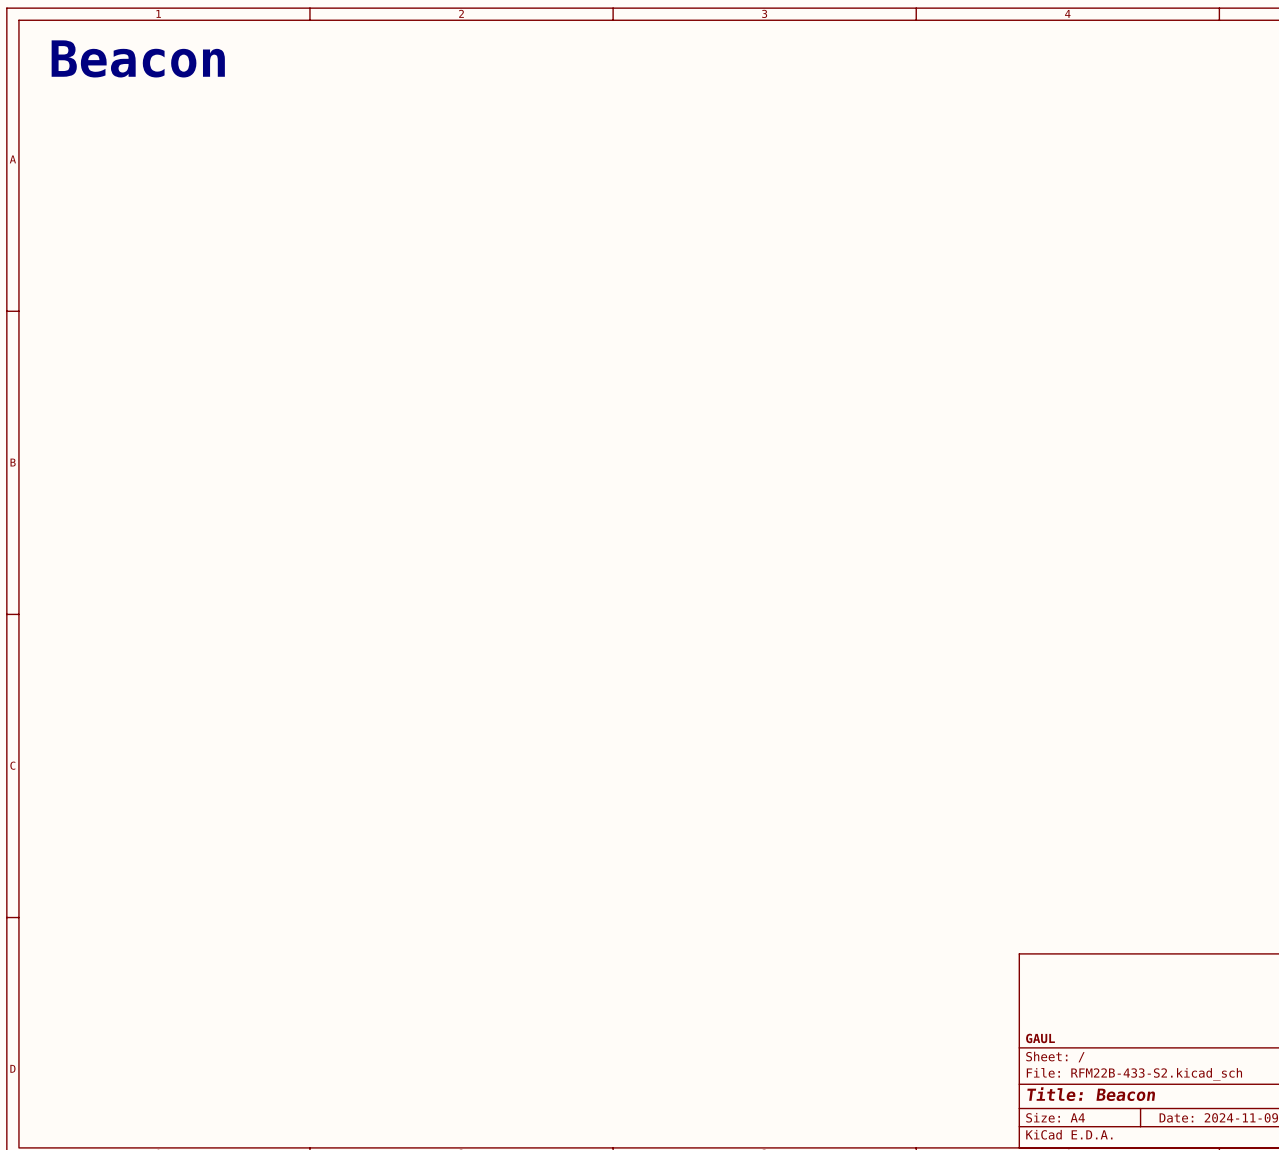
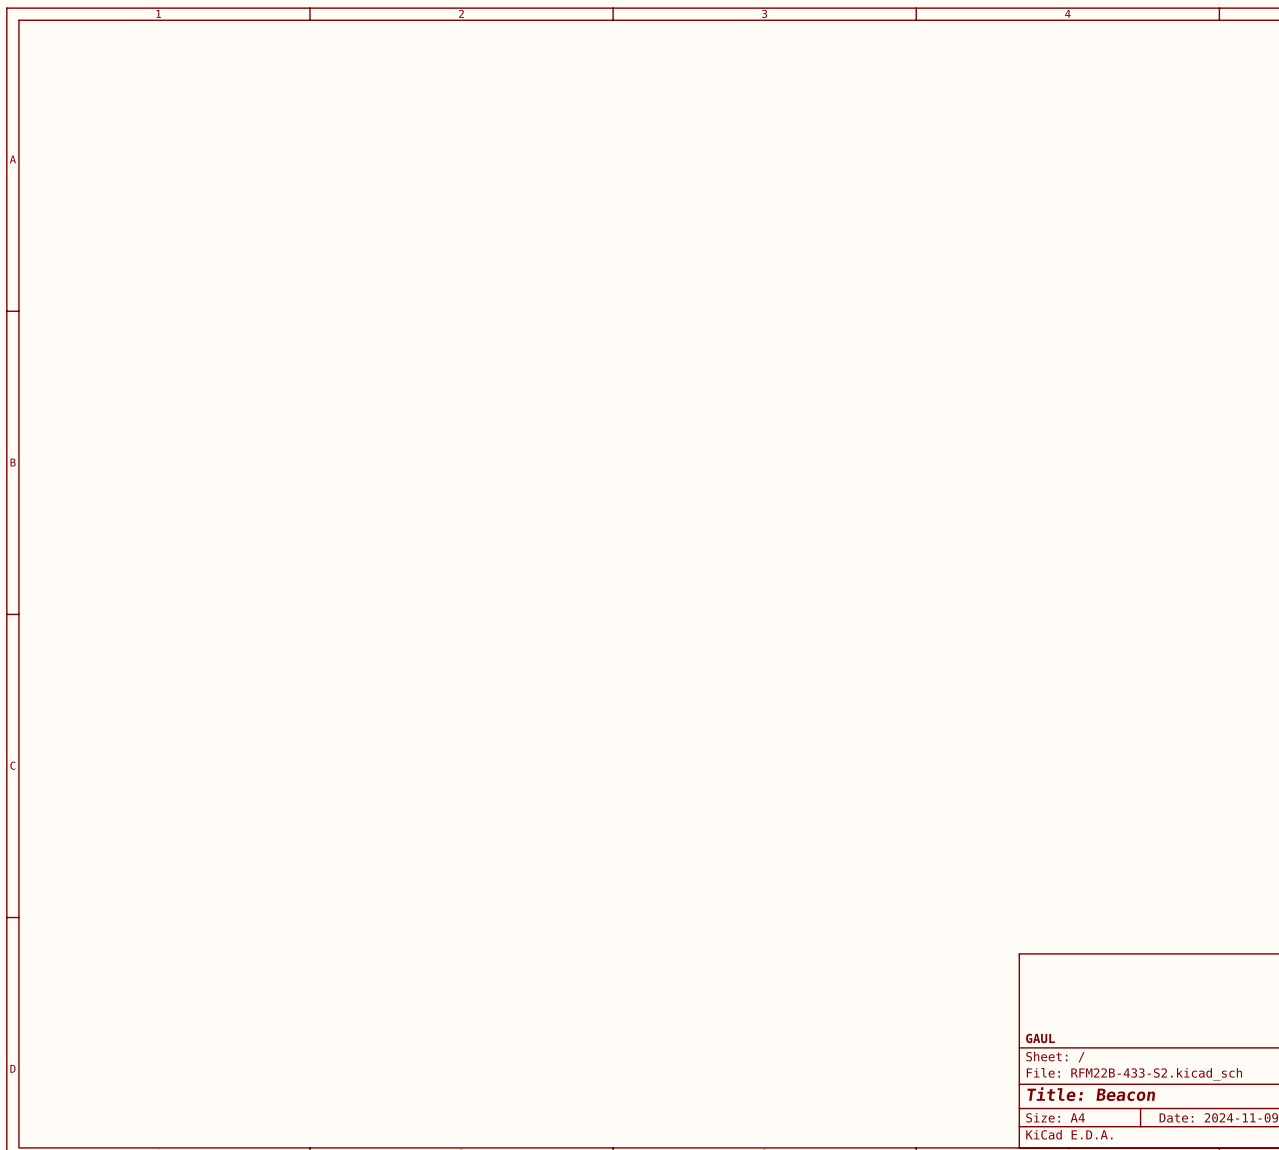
text: Beacon (138, 58) -> none

